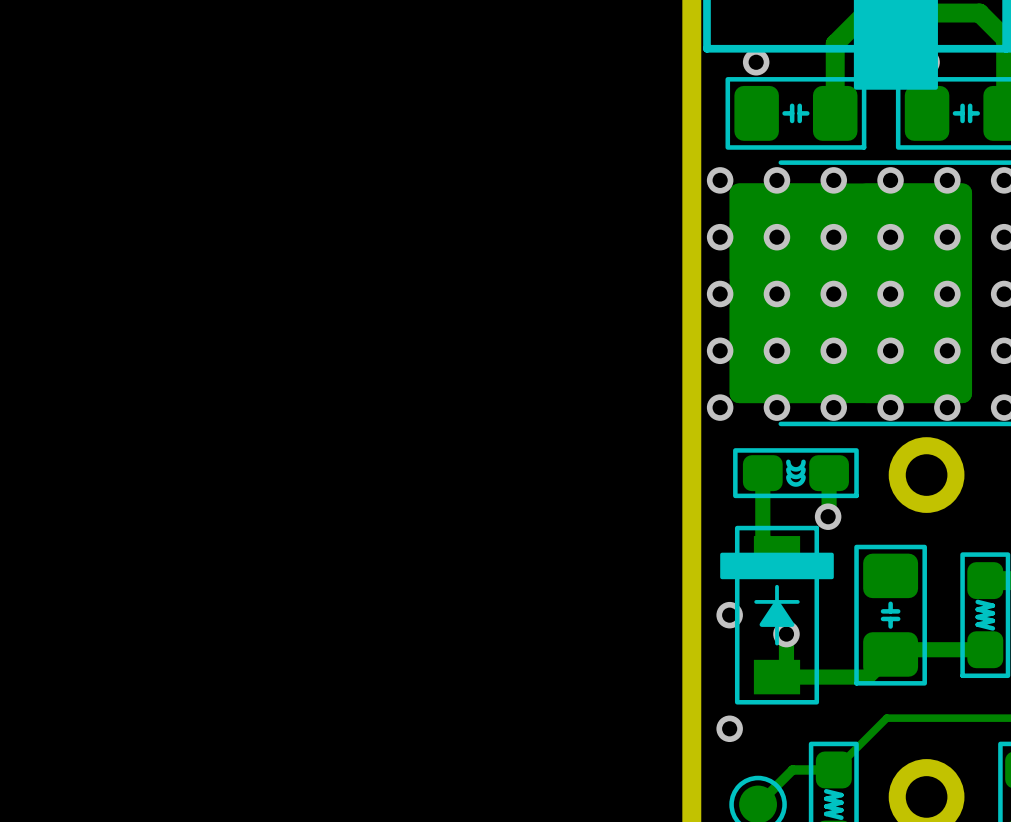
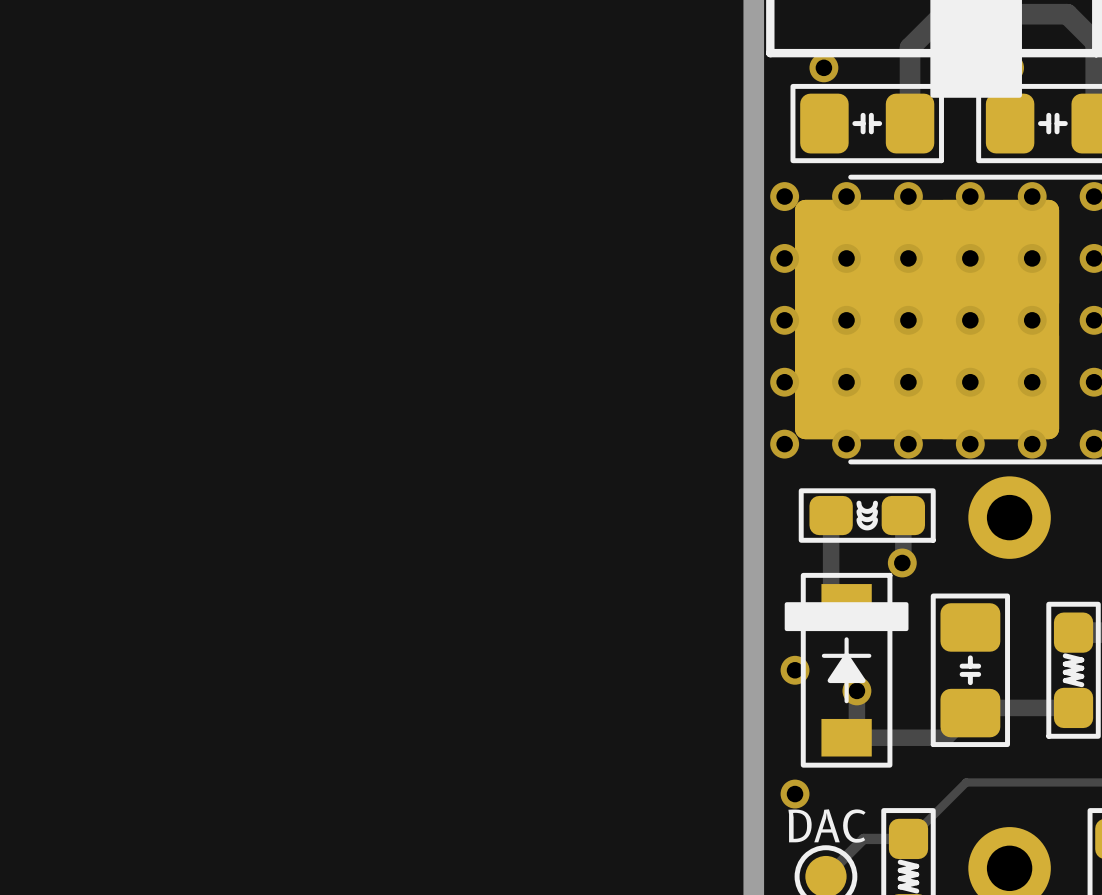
text: none -> DAC (826, 826)

